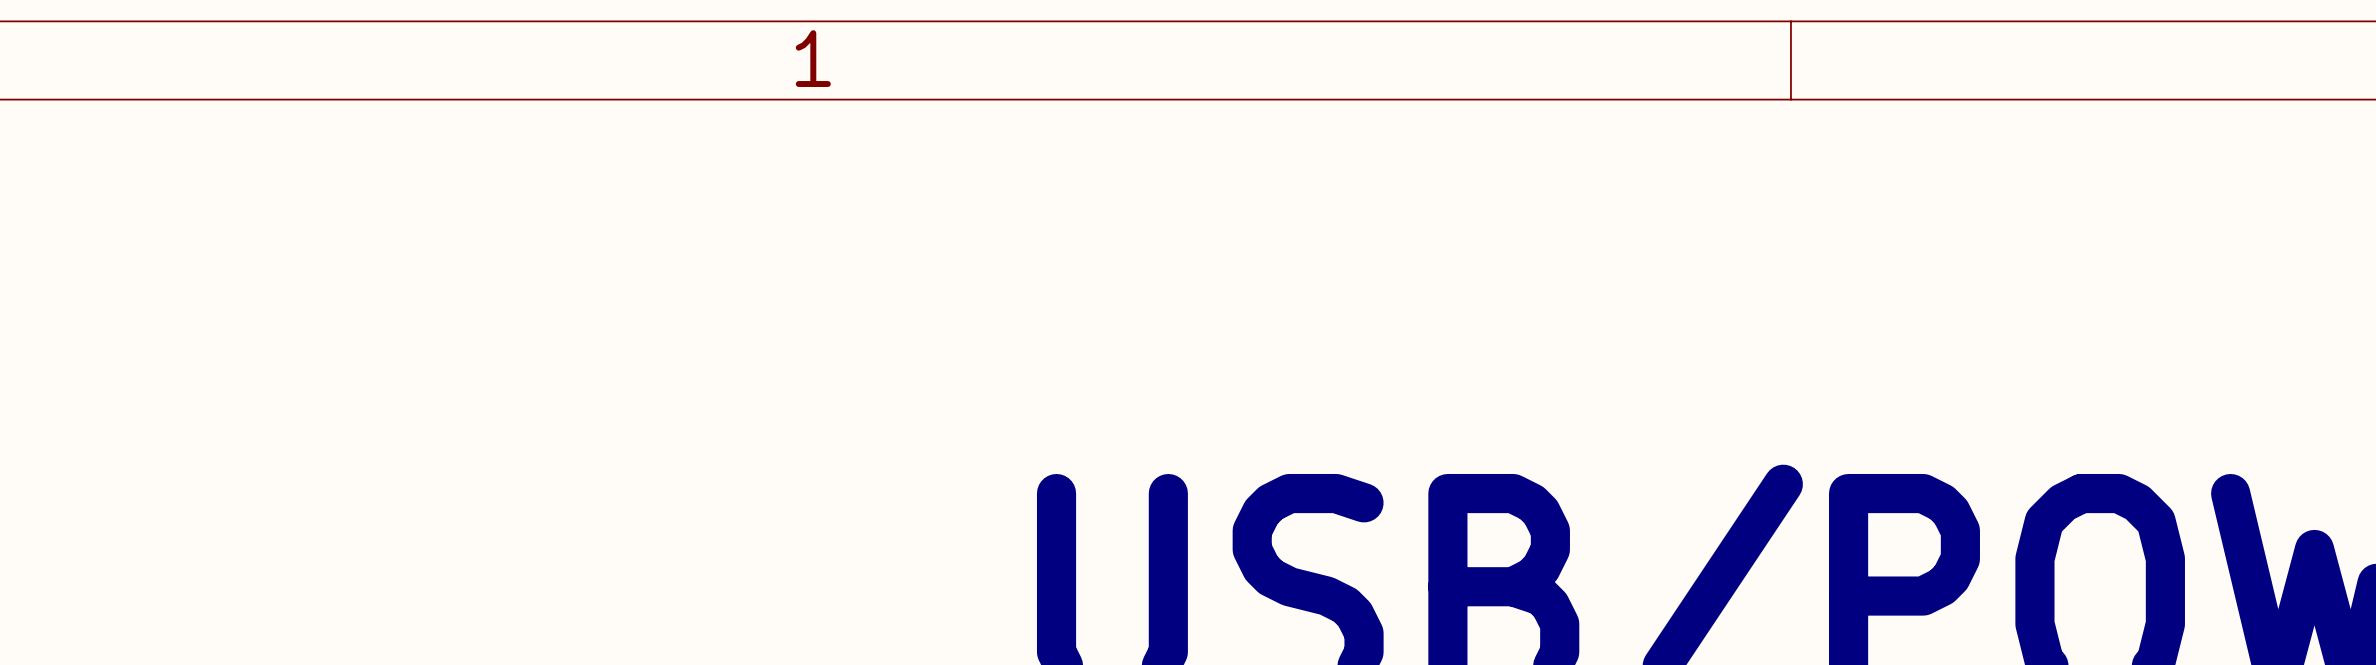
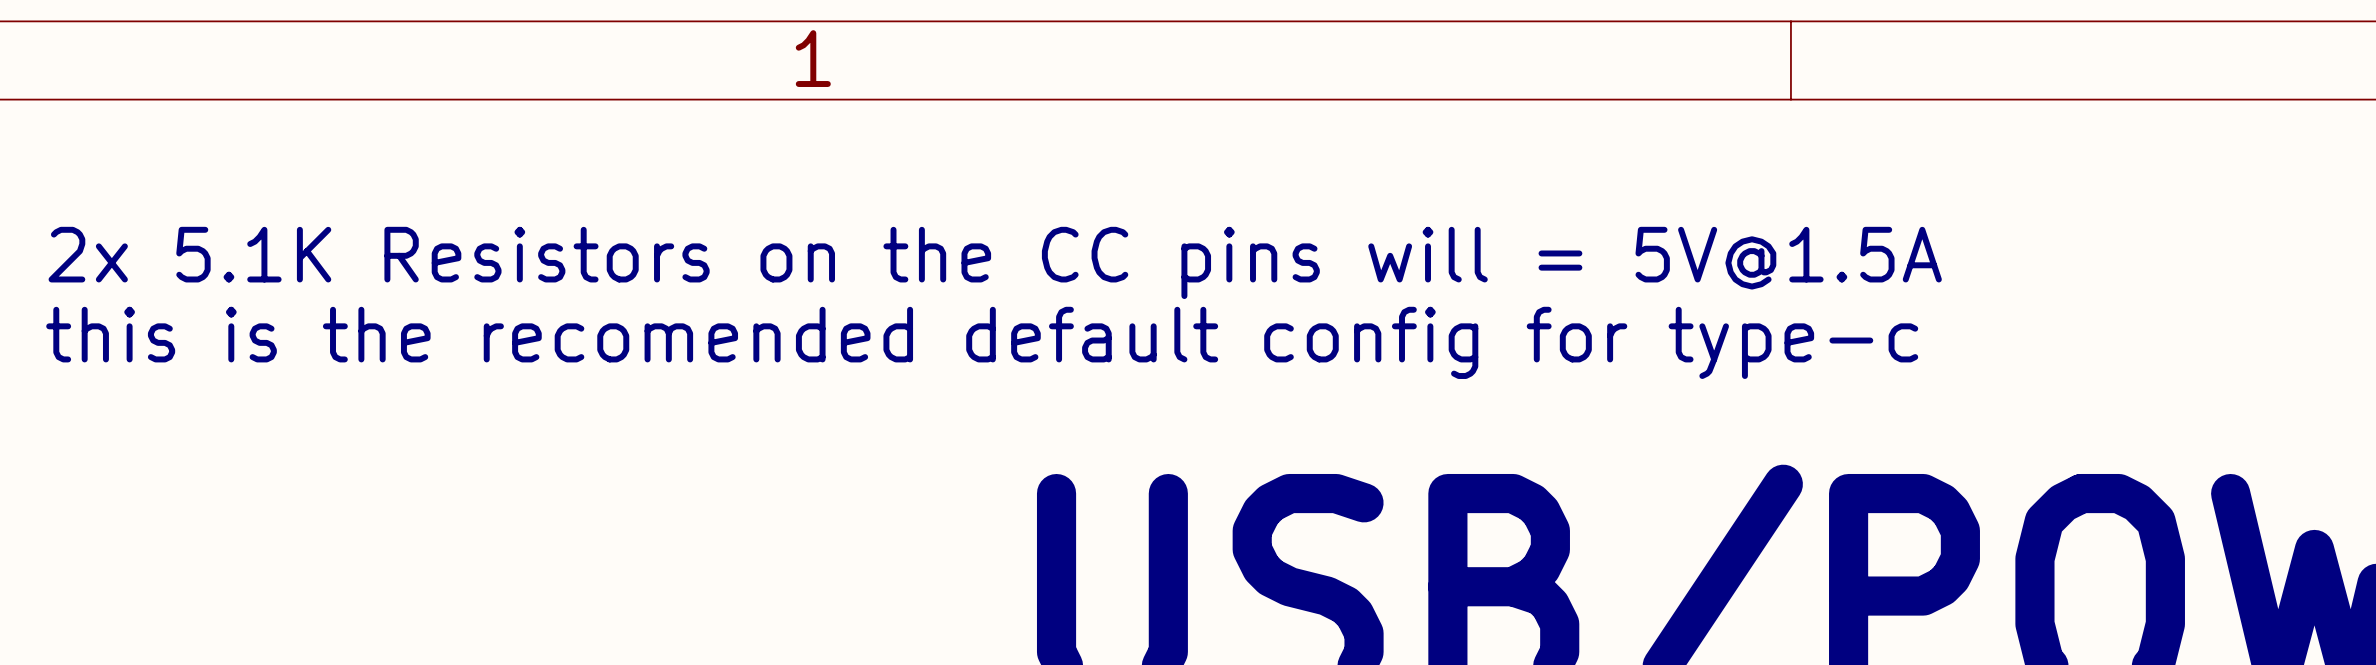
text: none -> 2x 5.1K Resistors on the CC pins will = 5V@1.5A (995, 262)
text: none -> this is the recomended default config for type-c (982, 342)

